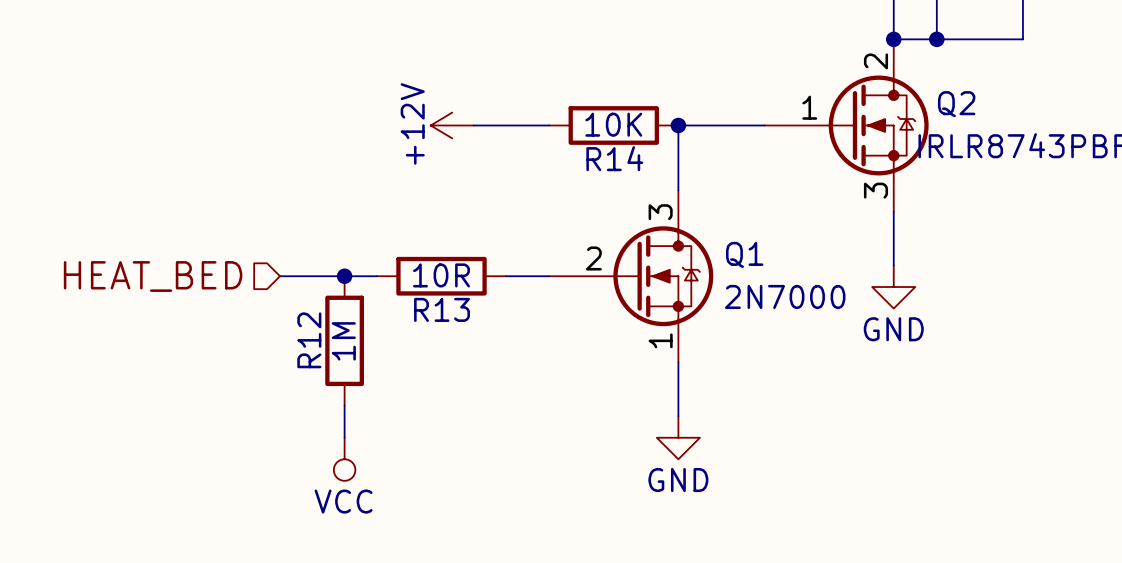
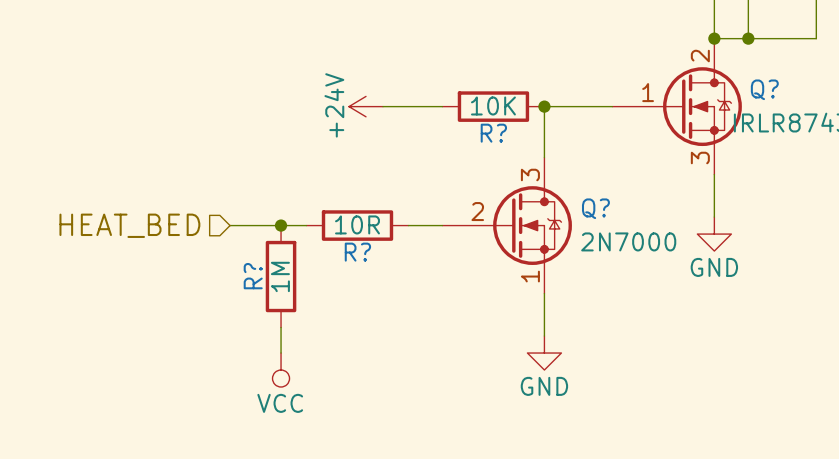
Q2 name: Q2 (956, 104) -> Q? (764, 89)
power symbol: +12V (452, 125) -> +24V (365, 106)
R14 name: R14 (614, 158) -> R? (493, 133)
Q1 name: Q1 (744, 254) -> Q? (595, 208)
R13 name: R13 (442, 309) -> R? (357, 252)
R12 name: R12 (309, 340) -> R? (253, 276)

